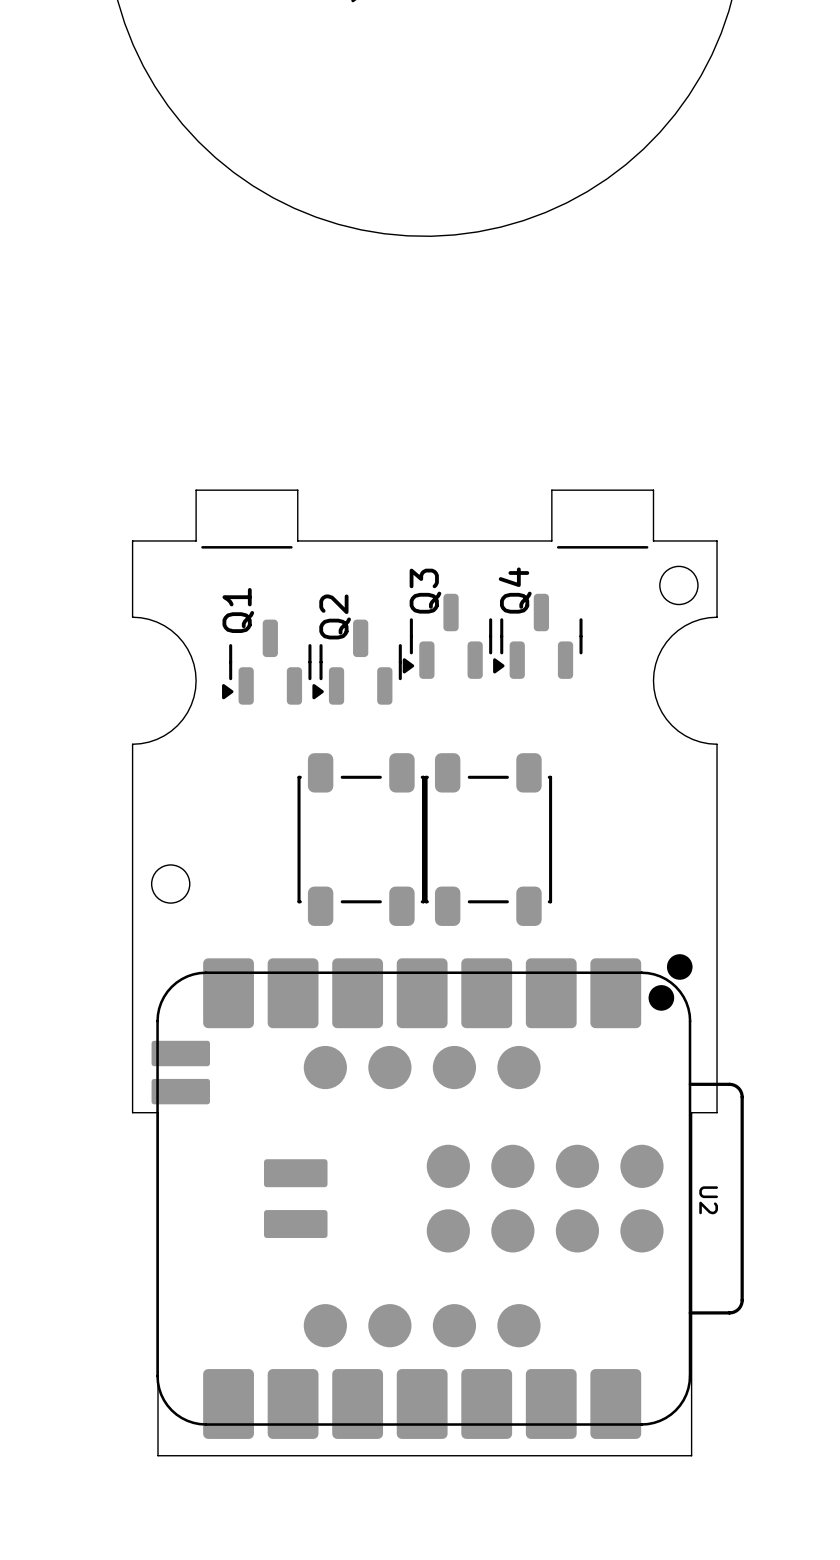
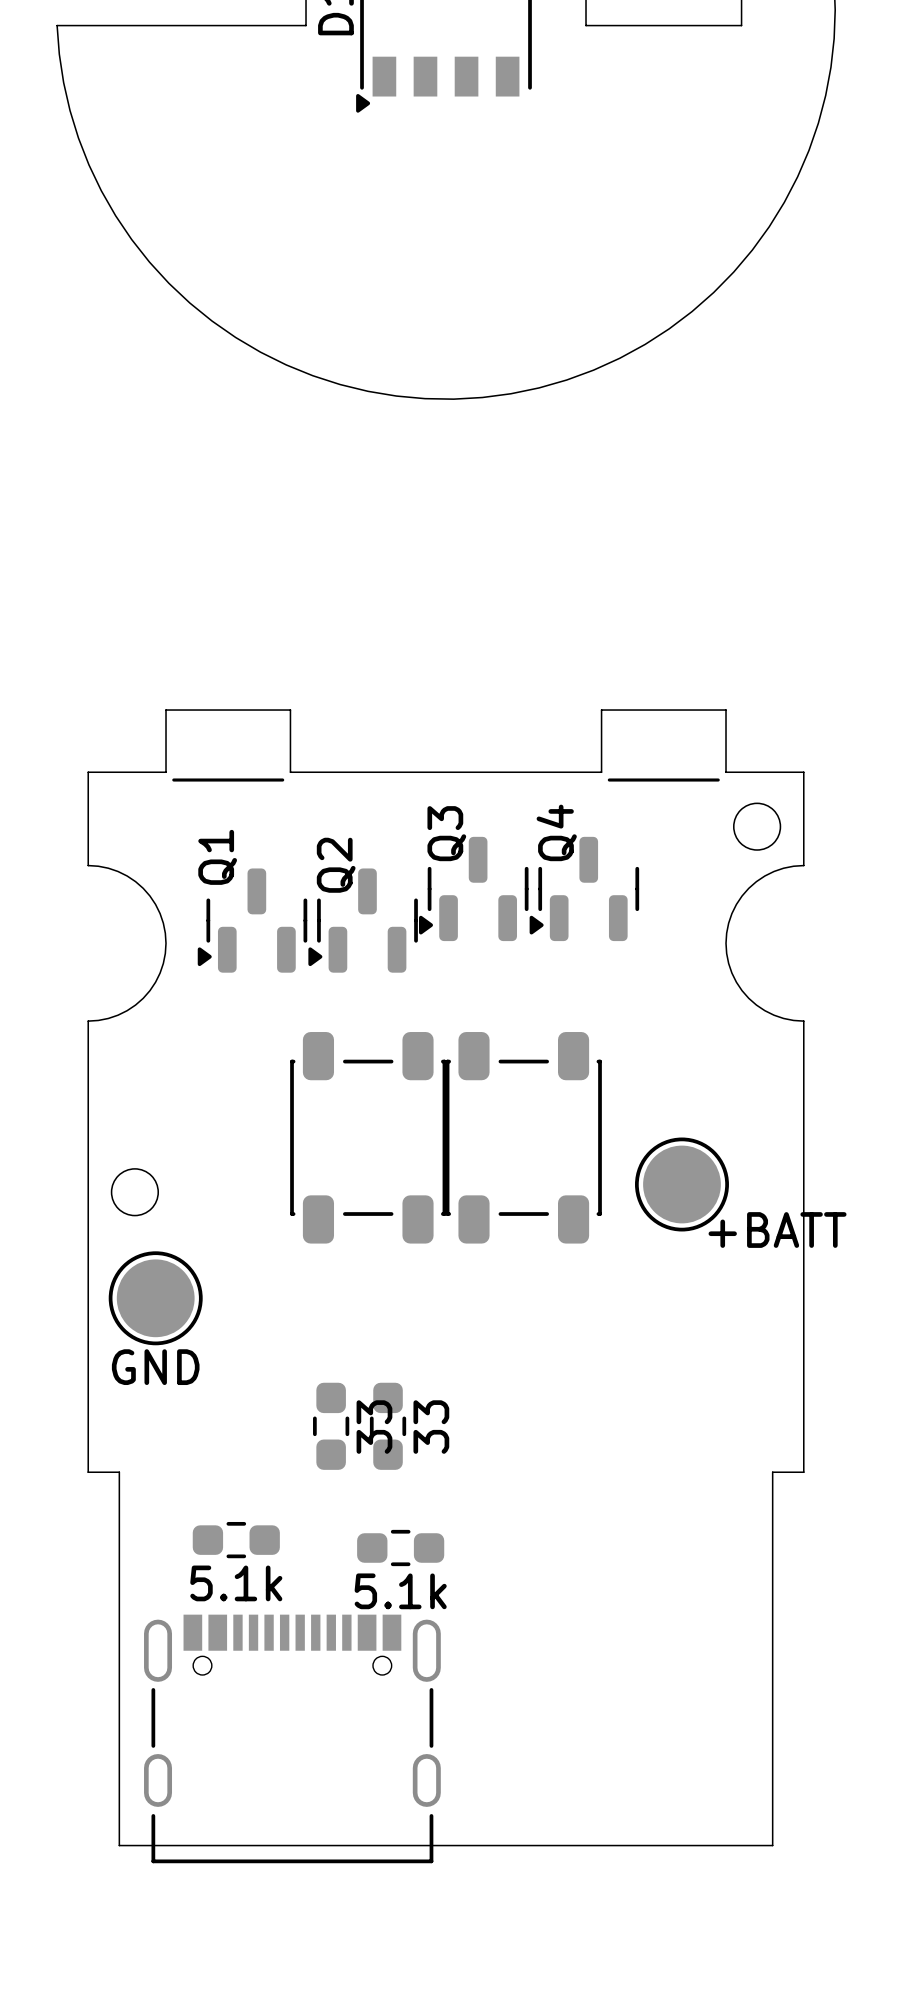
part: none -> +BATT (681, 1184)
part: none -> GND (155, 1298)
part: none -> 33 (331, 1426)
part: none -> 33 (388, 1426)
part: none -> 5.1k (236, 1540)
part: none -> 5.1k (400, 1548)
U2: (447, 1196) -> none
part: none -> (292, 1738)
board edge: (158, 1417) (158, 1455) (691, 1455) (691, 1417) -> (119, 1845) (772, 1845)

